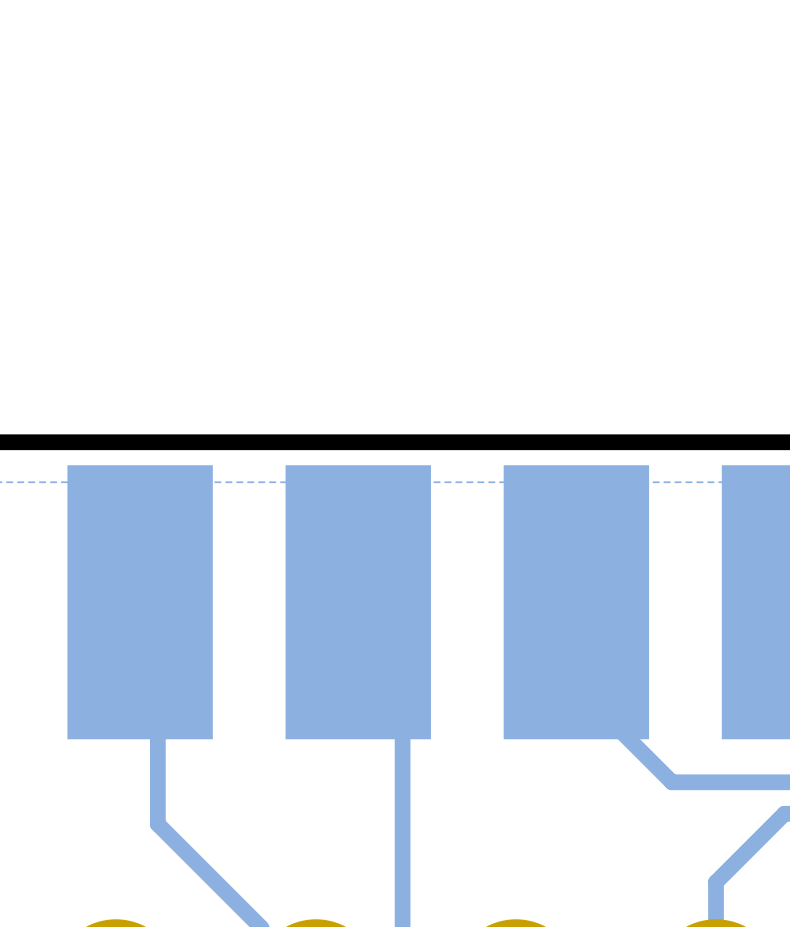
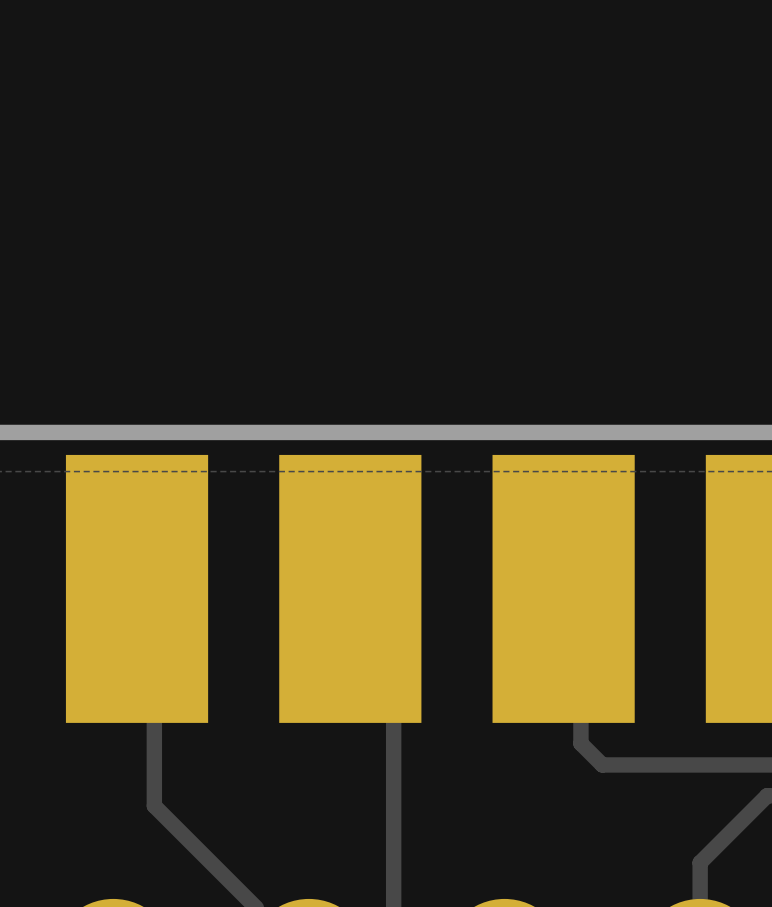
track: (594, 704) (671, 782) -> (580, 688) (580, 743) (602, 764) (657, 764)

